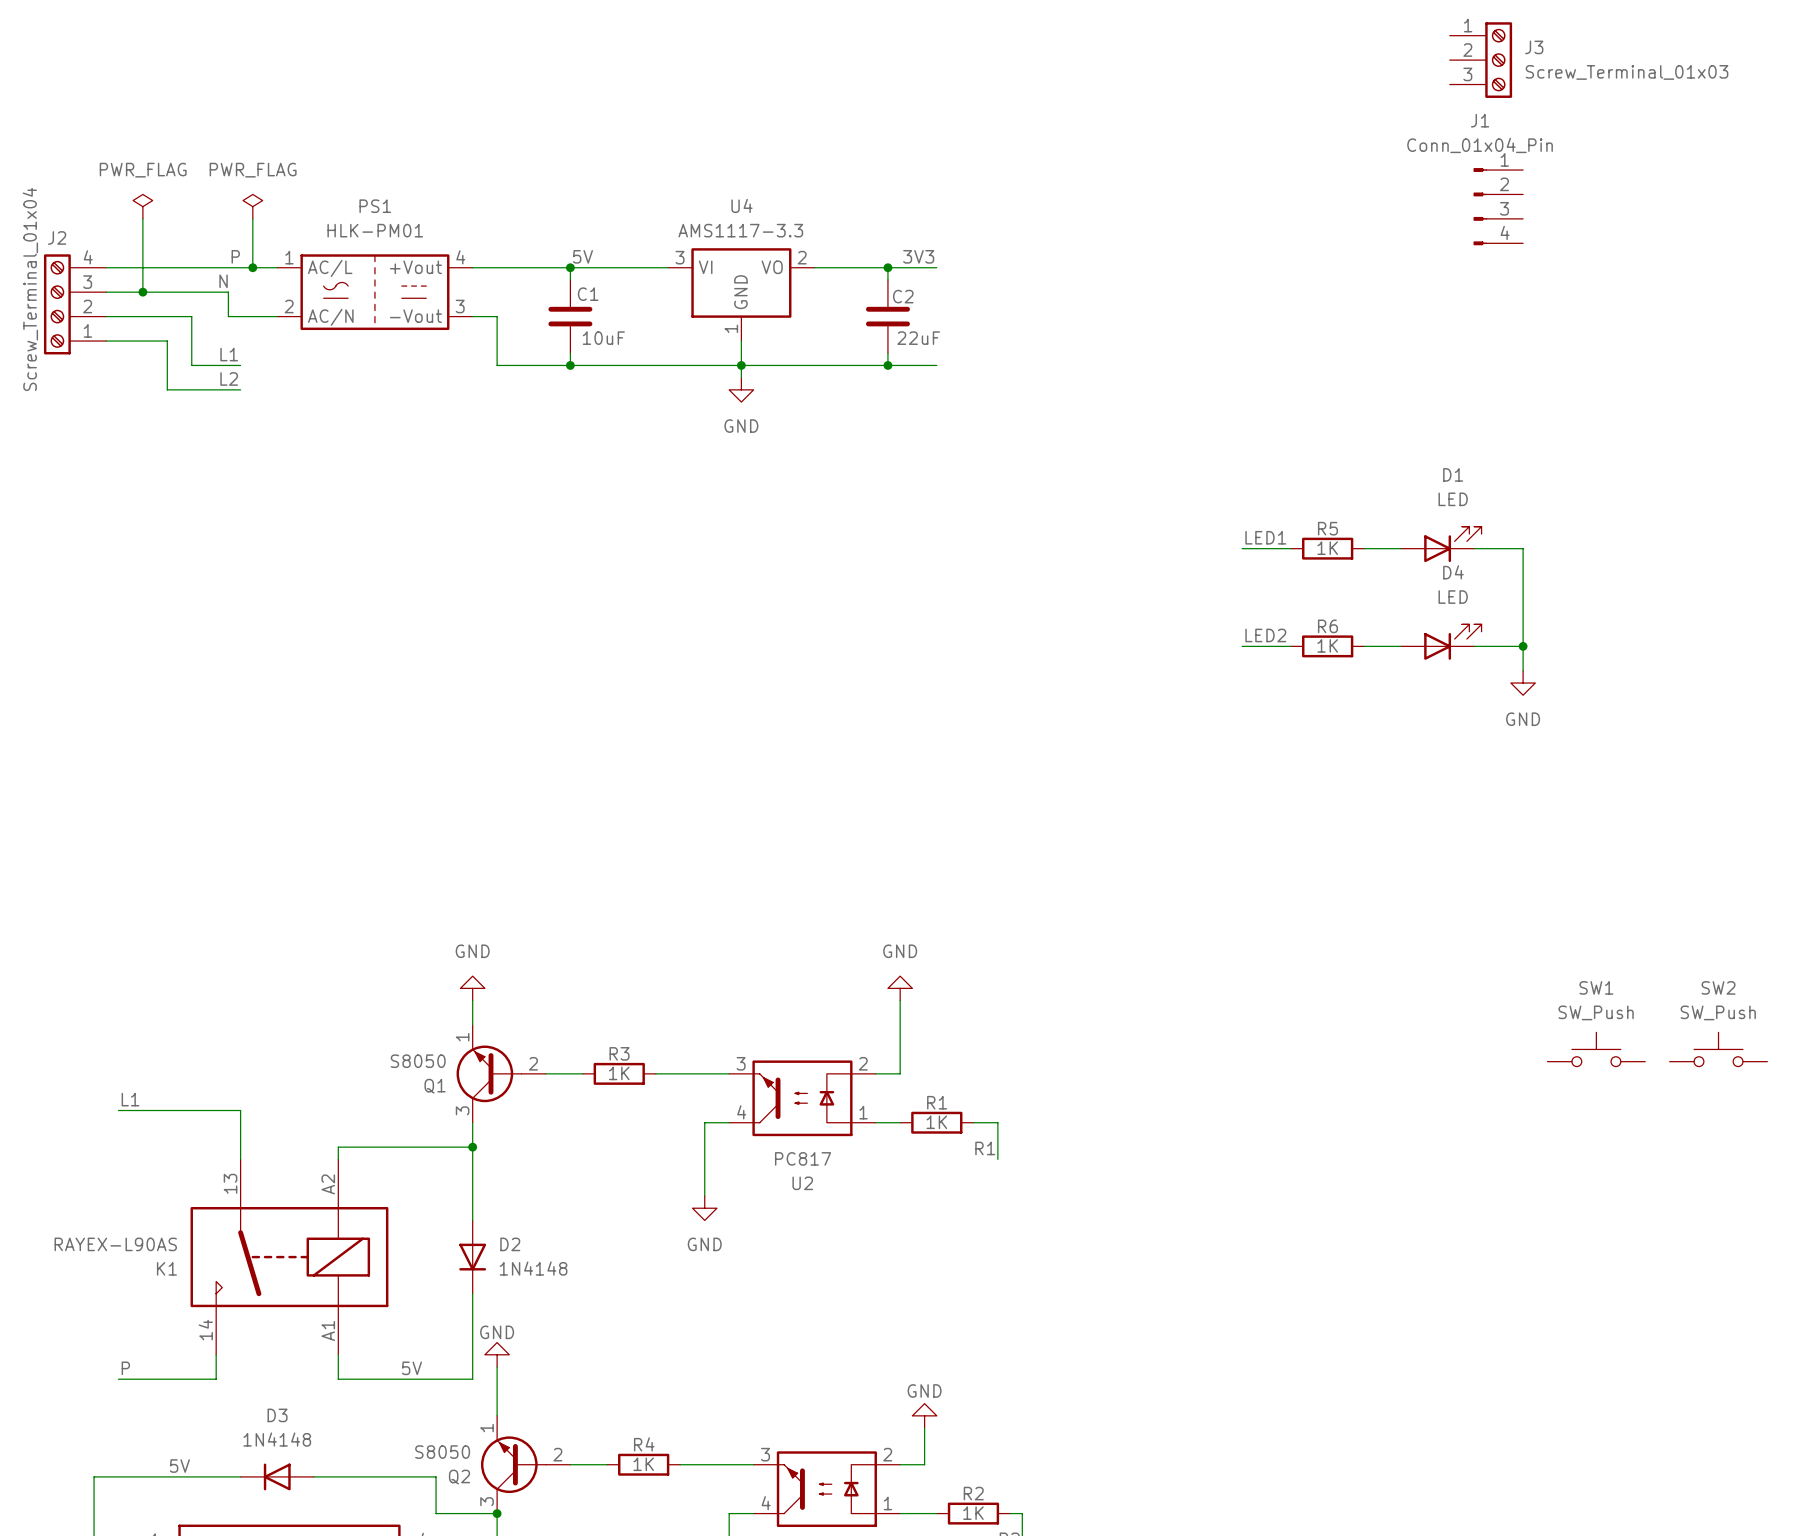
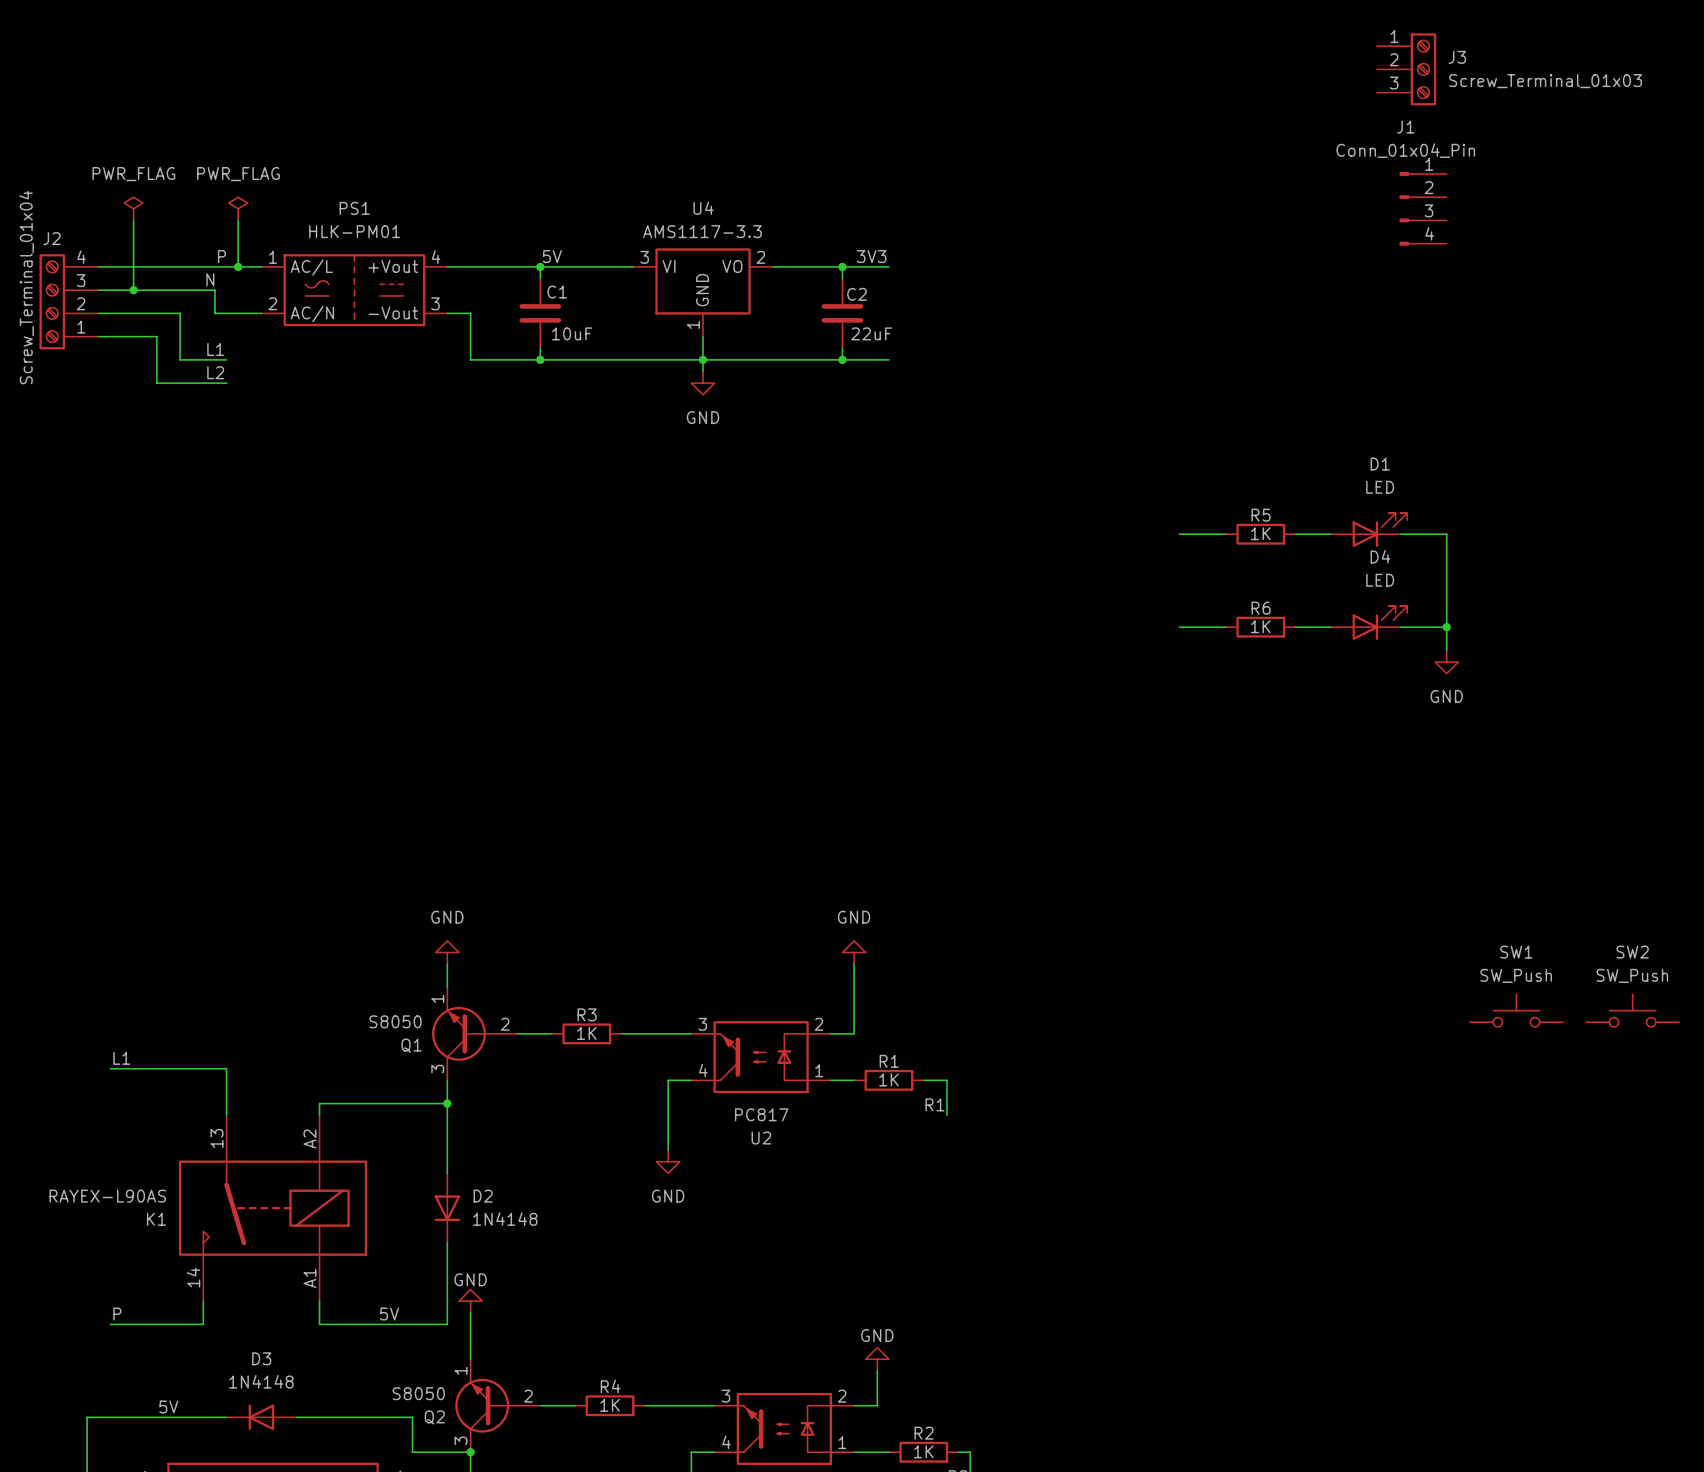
label: LED1 (1265, 537) -> none
label: LED2 (1265, 635) -> none

